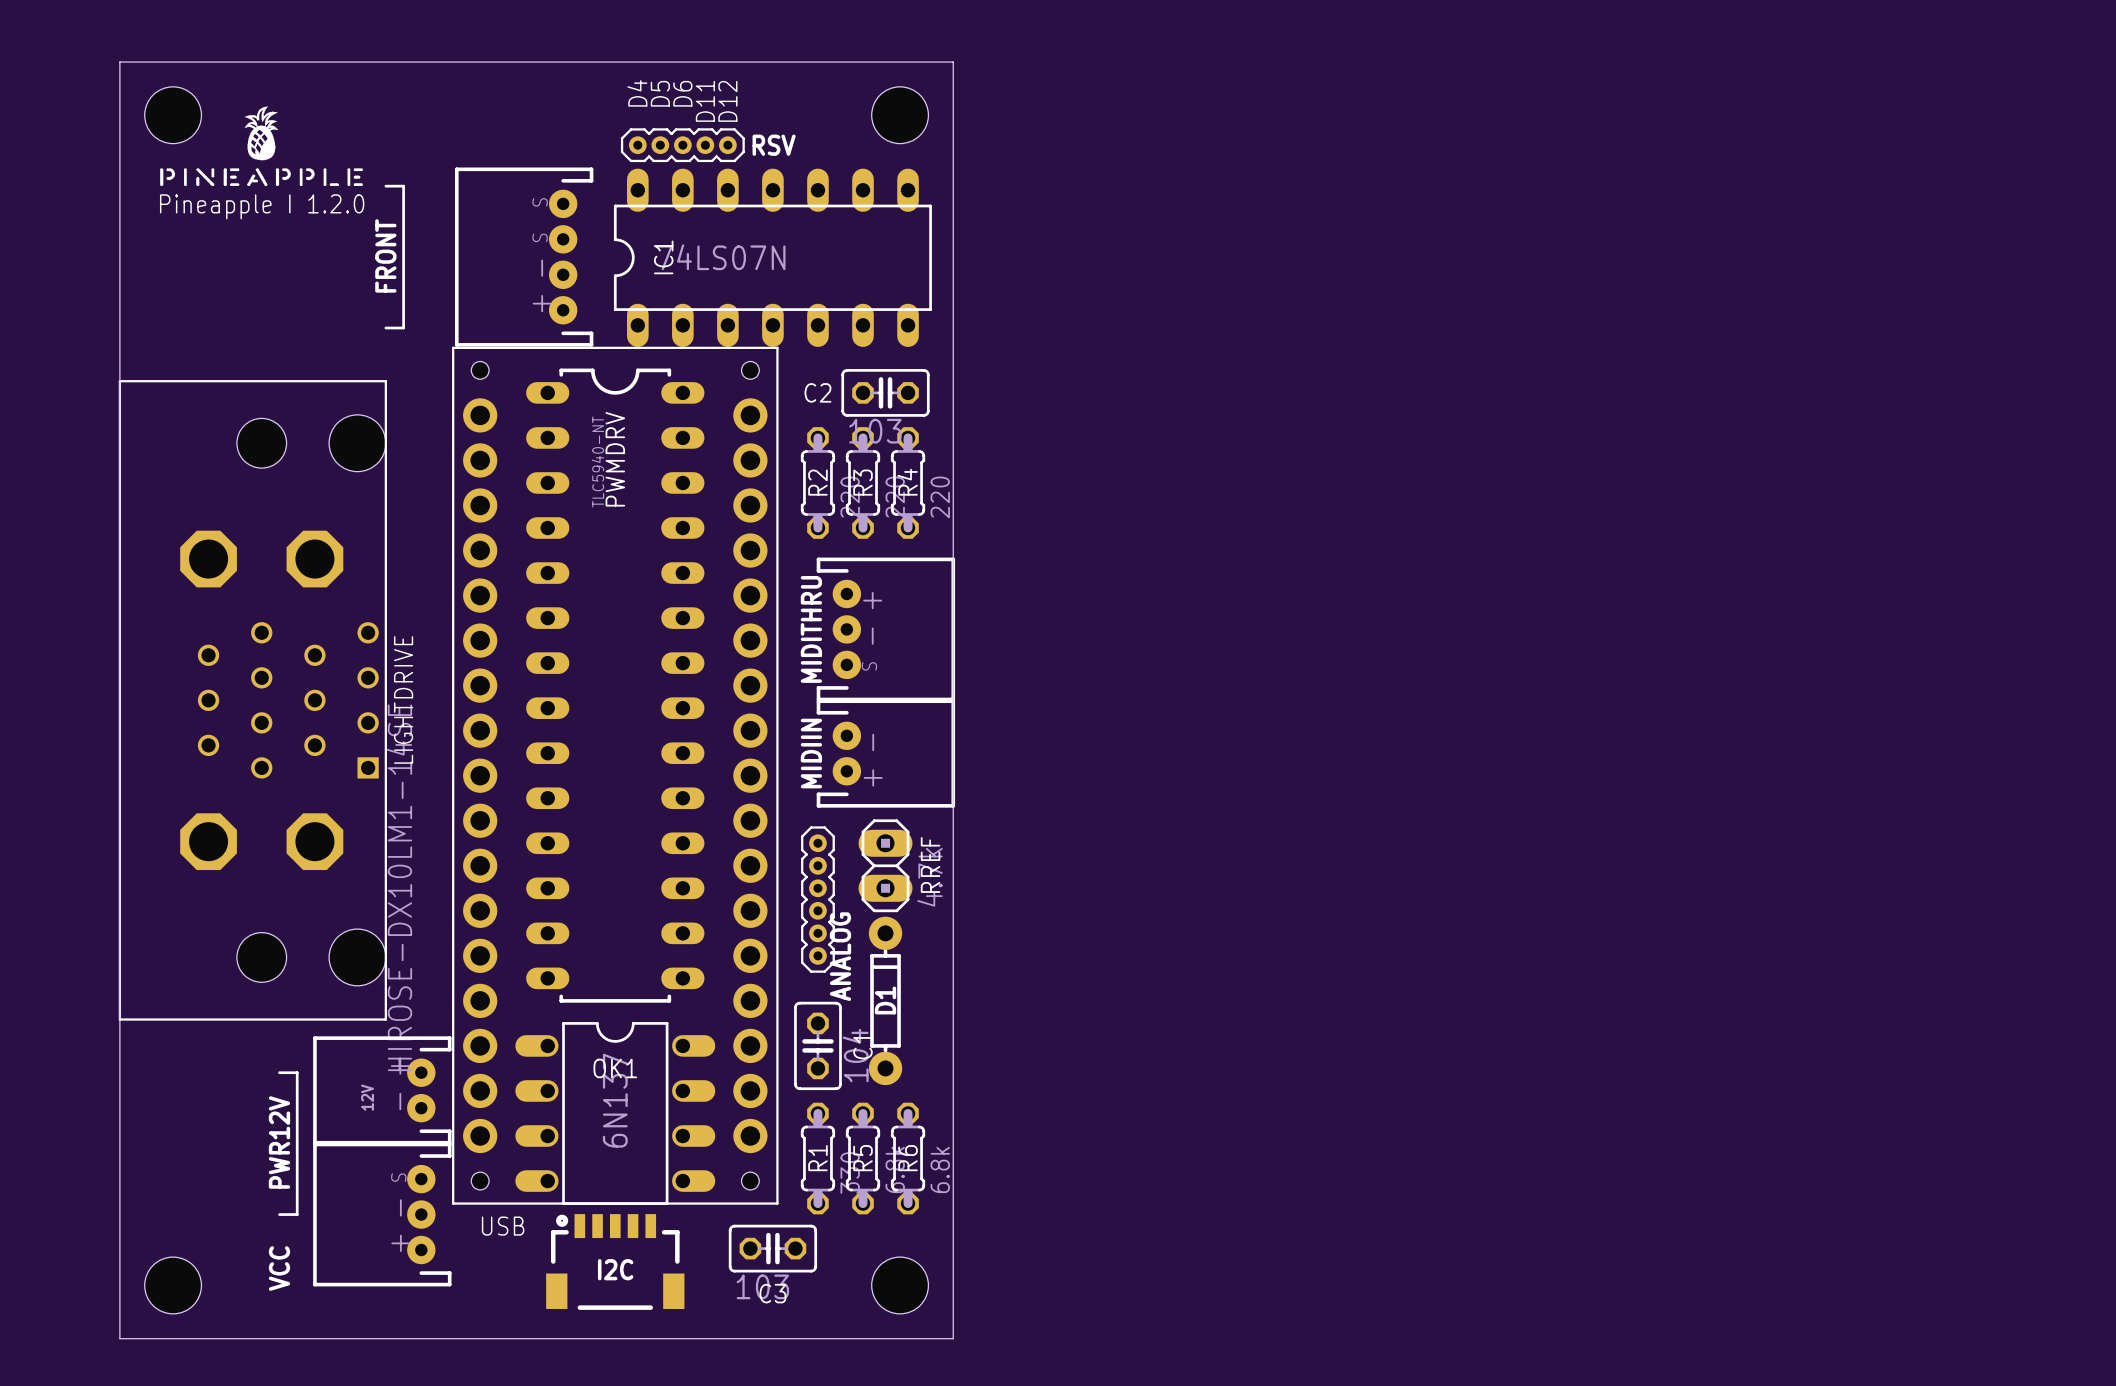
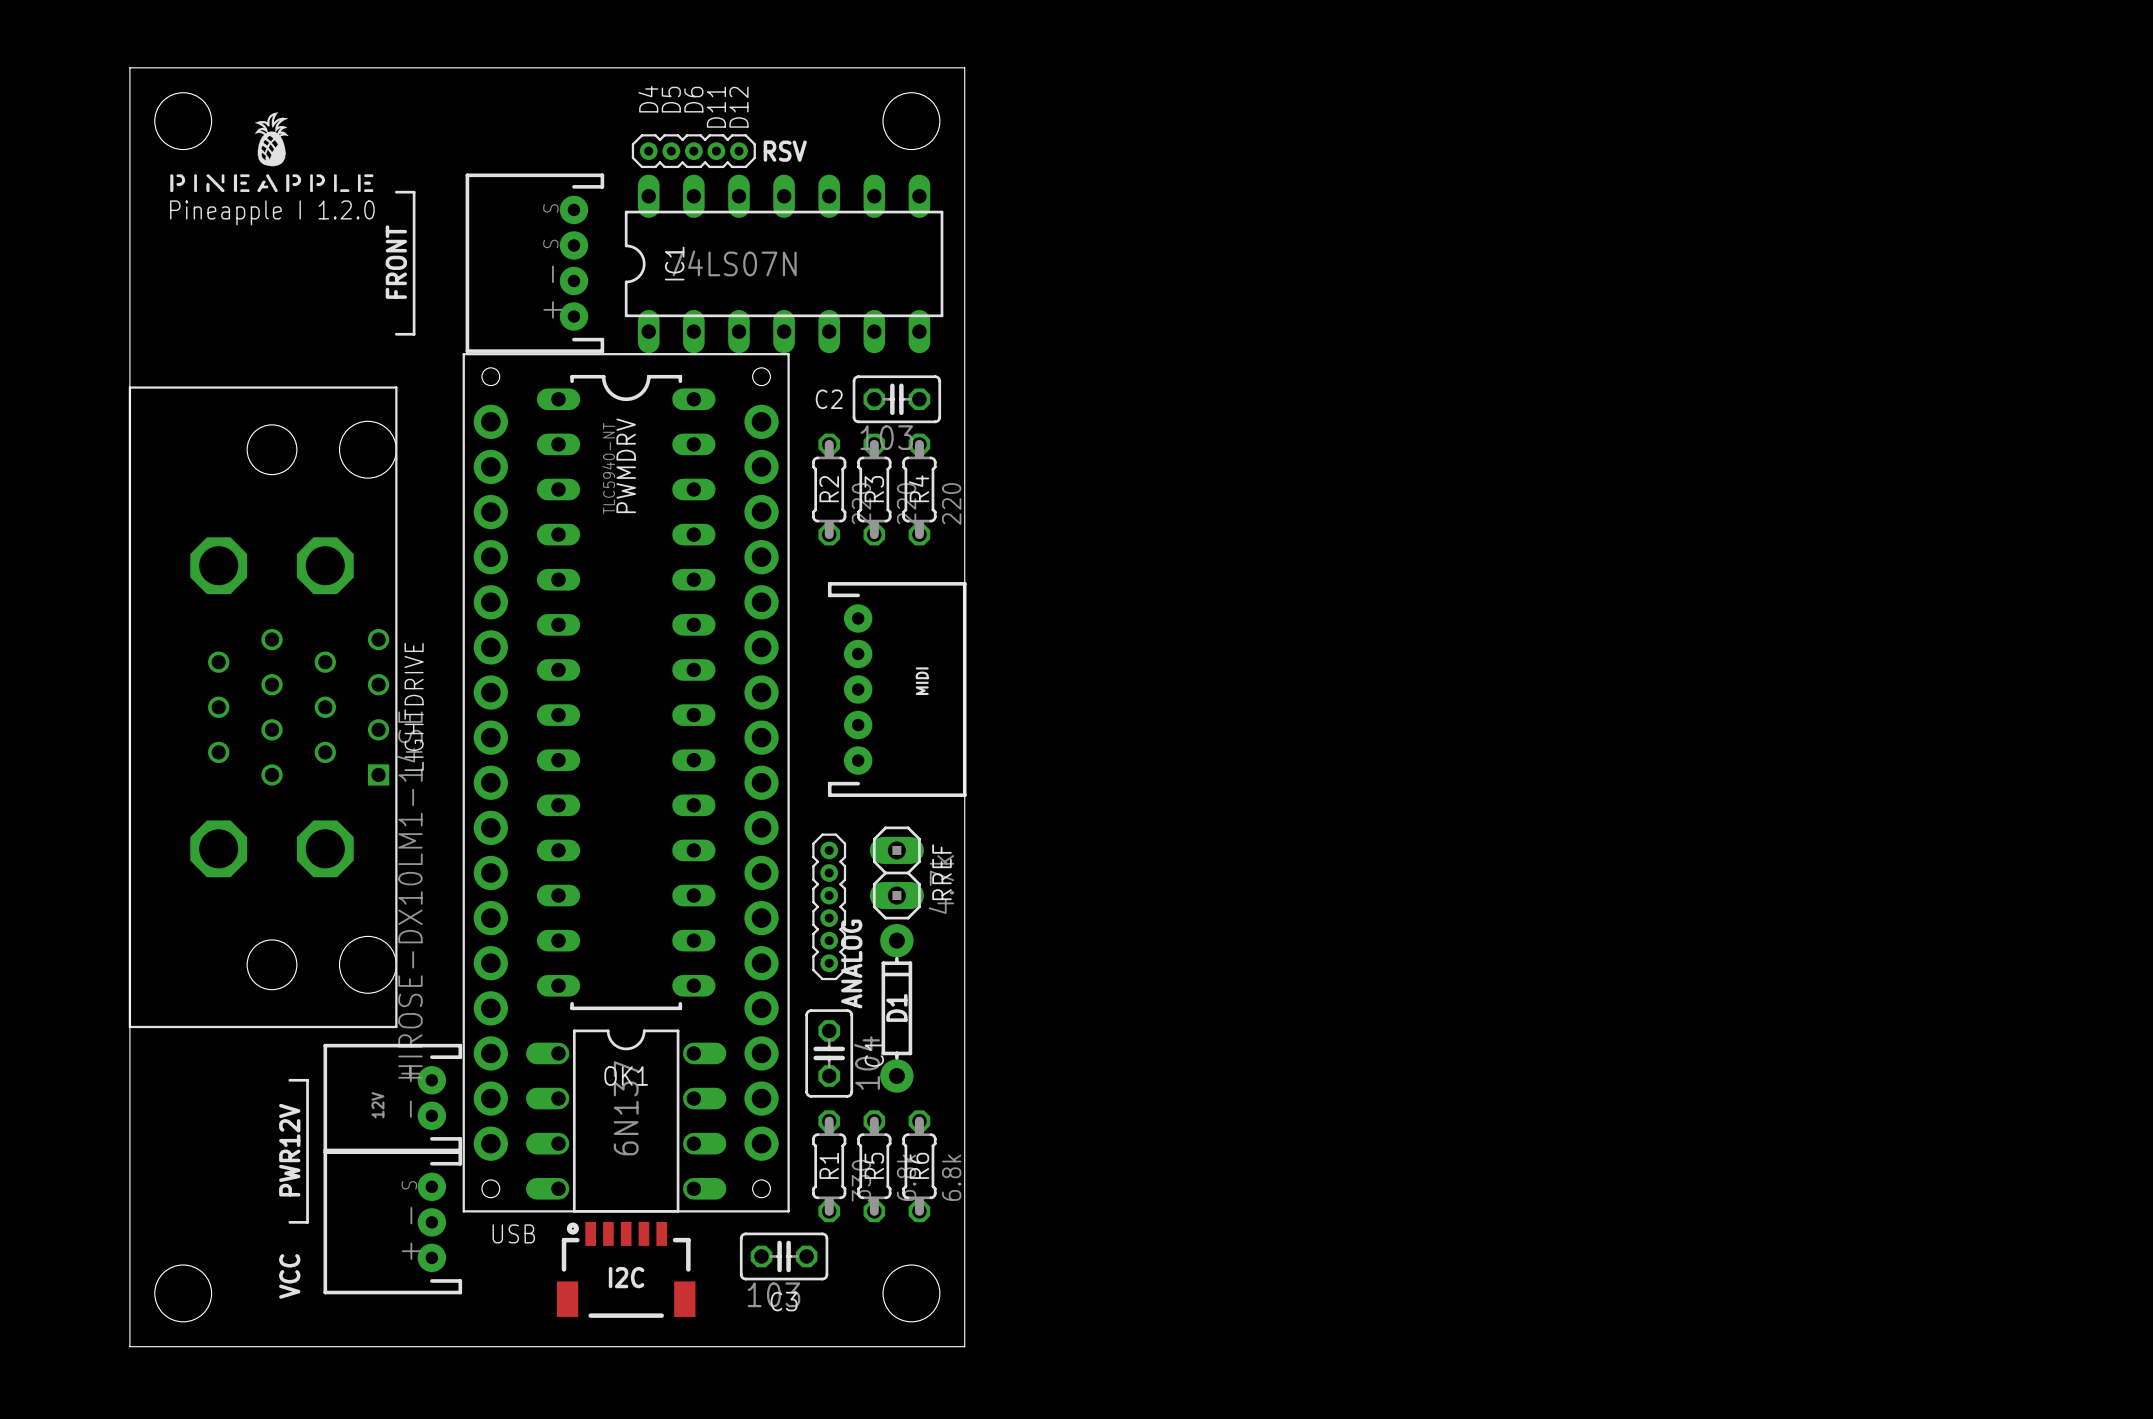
MIDITHRU: (885, 629) -> none
MIDI: none -> (897, 689)
MIDIIN: (885, 753) -> none

